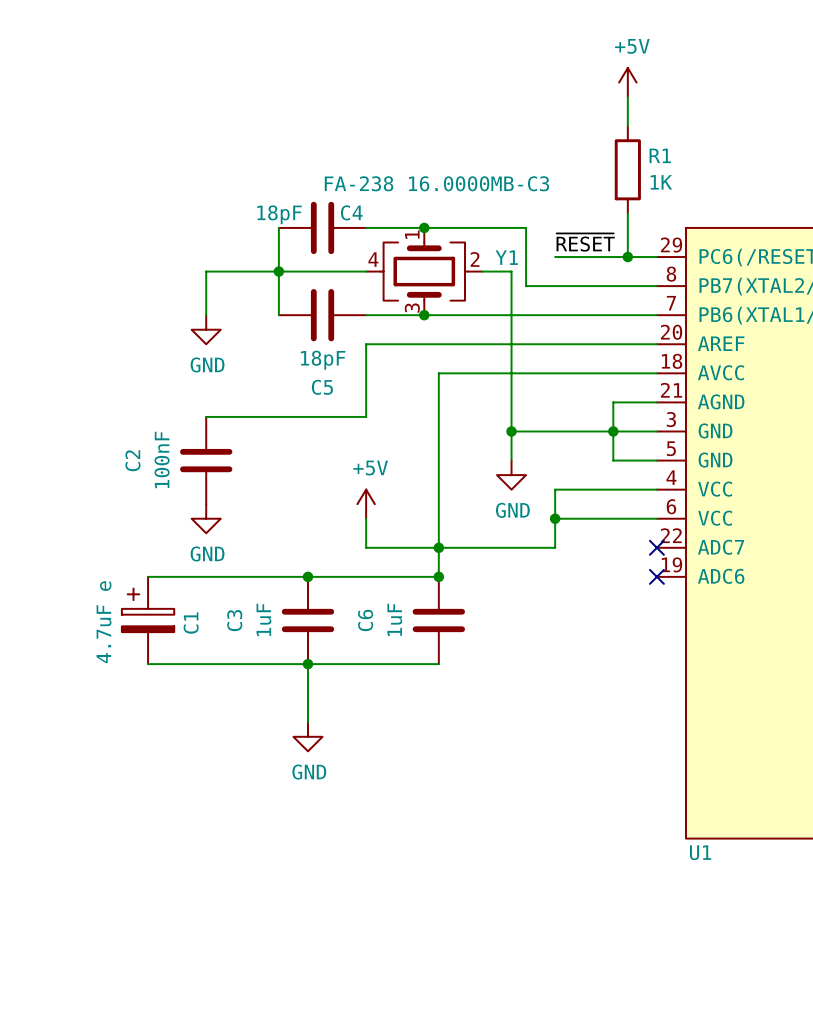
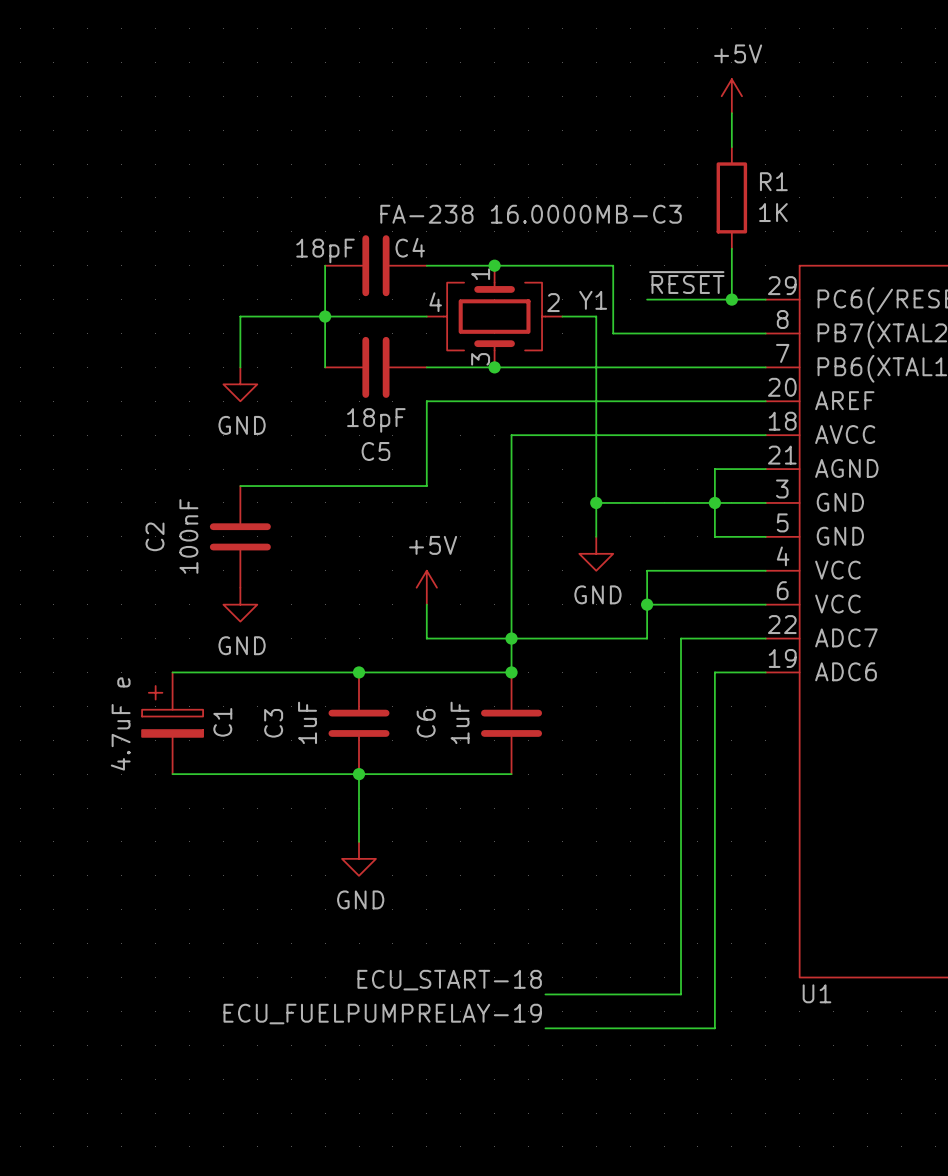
wire: none -> (765, 638) (681, 638) (681, 994) (545, 994)
no-connect mark: (656, 547) -> none
wire: none -> (765, 672) (714, 672) (714, 1028) (545, 1028)
no-connect mark: (656, 576) -> none
label: none -> ECU_START-18 (449, 980)
label: none -> ECU_FUELPUMPRELAY-19 (382, 1014)

